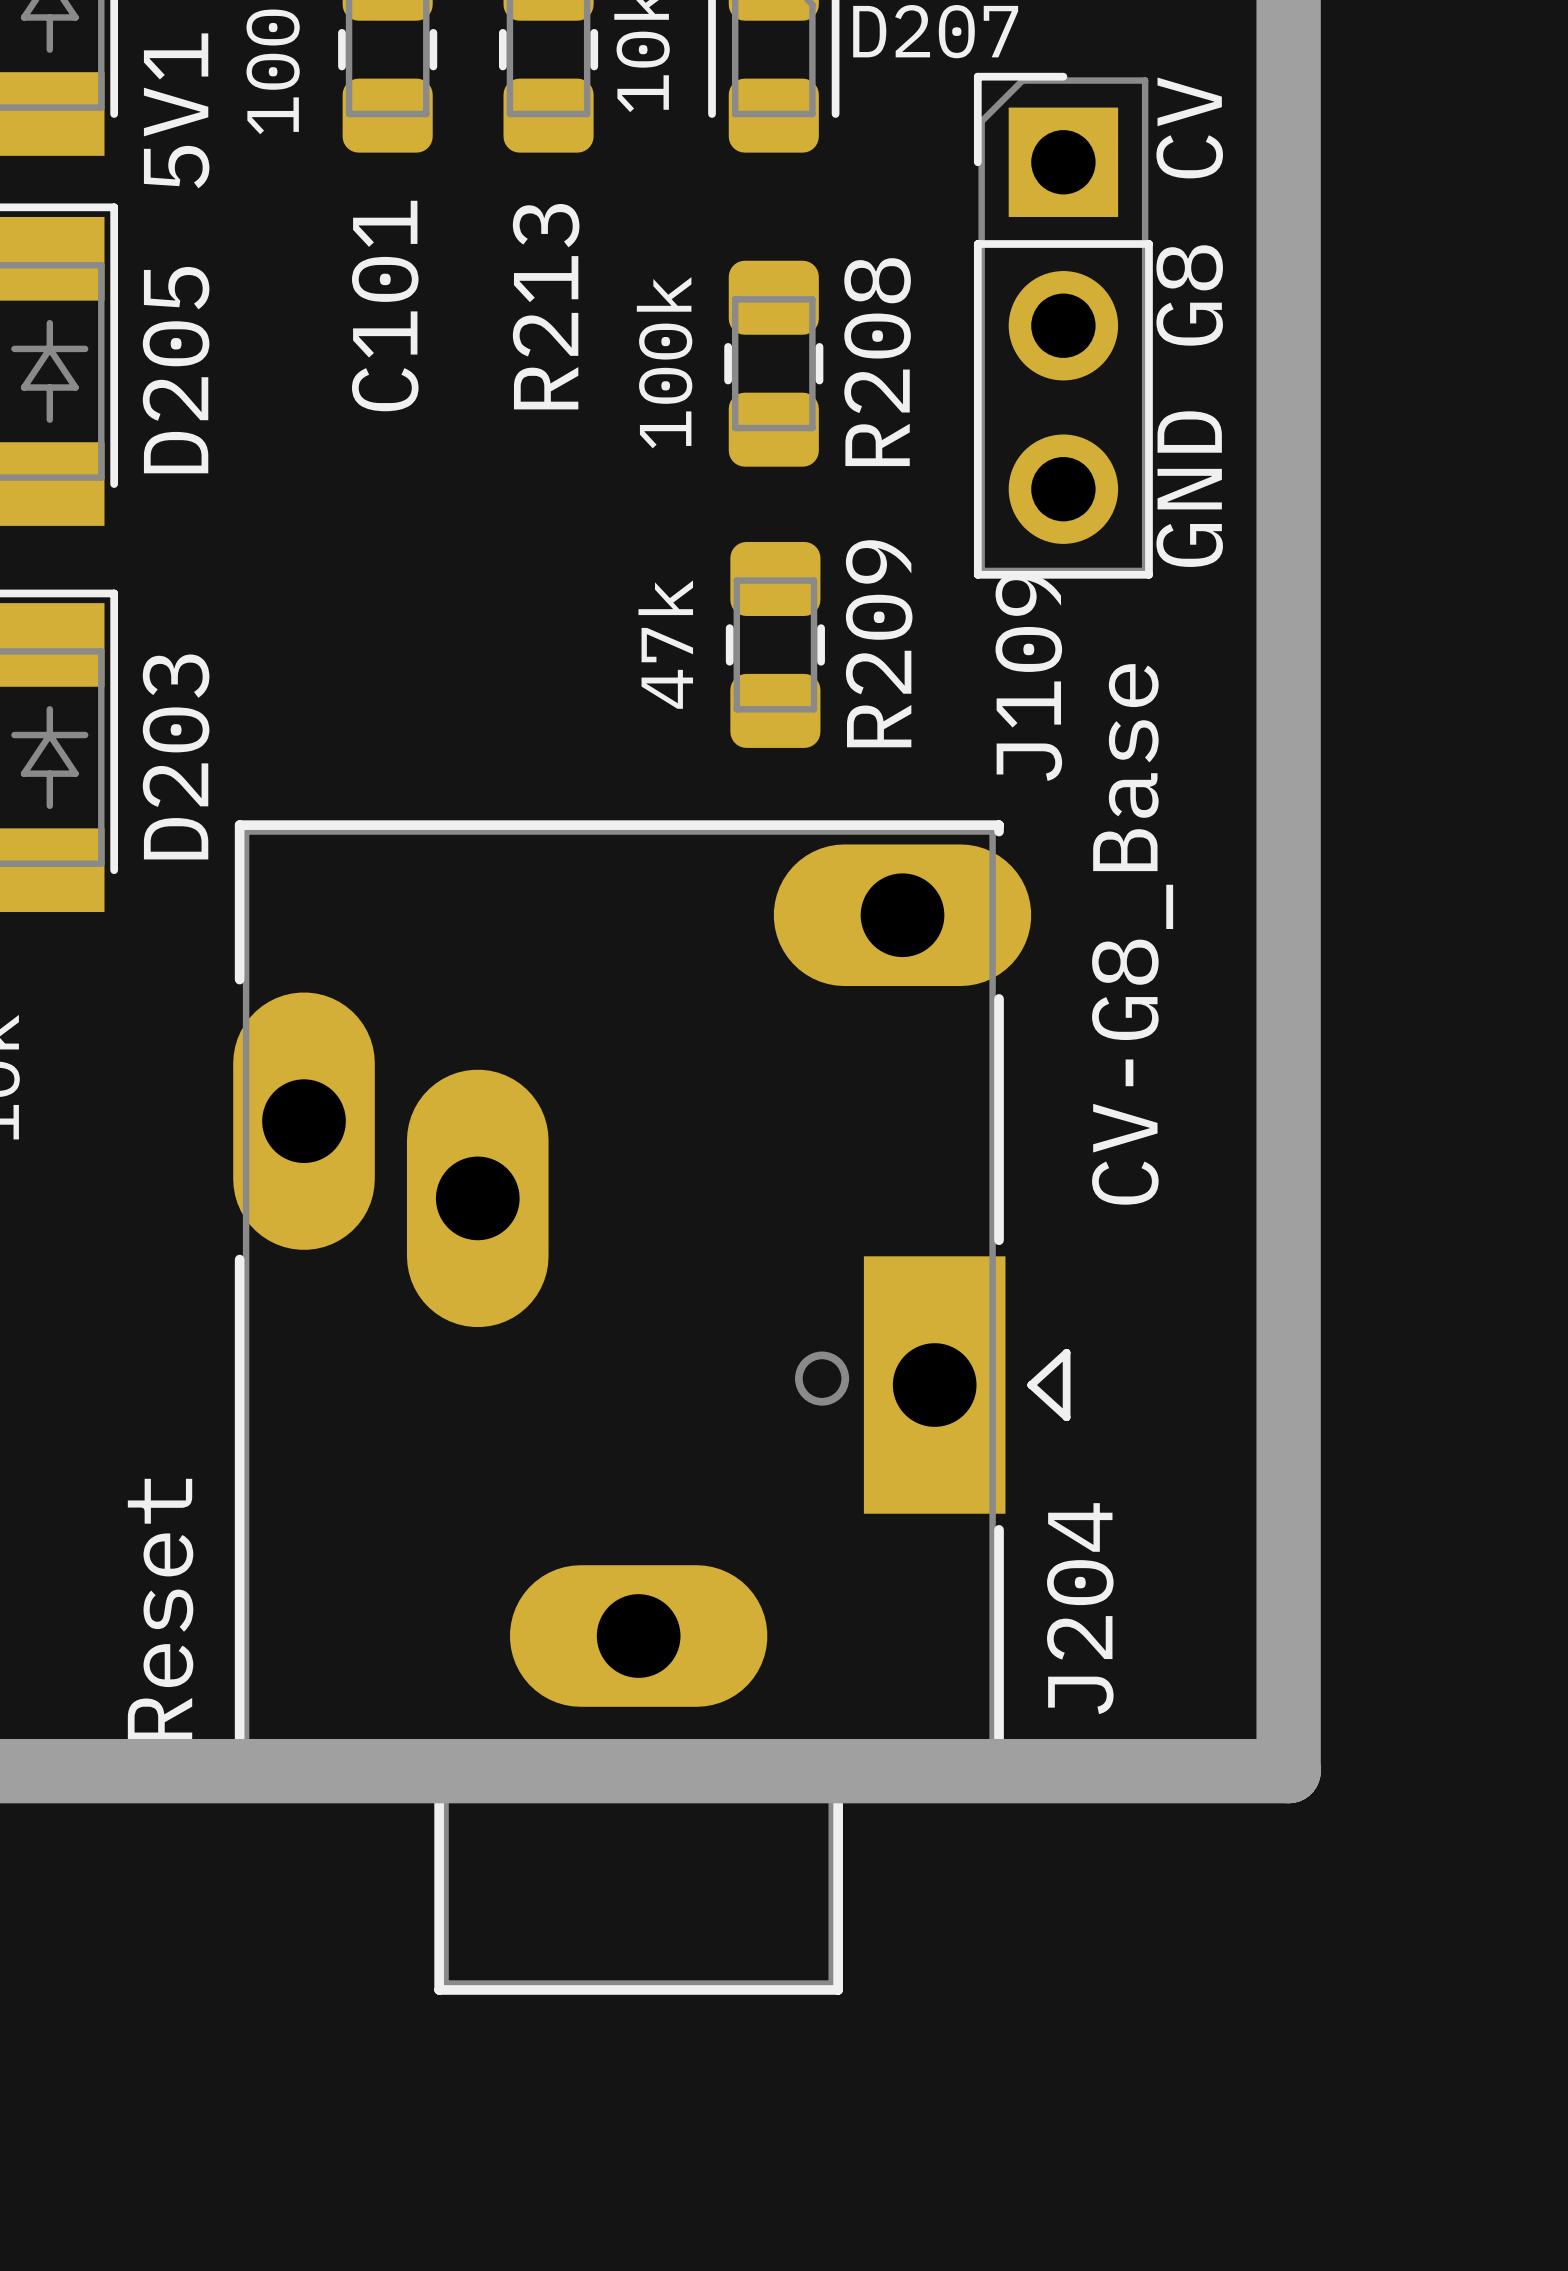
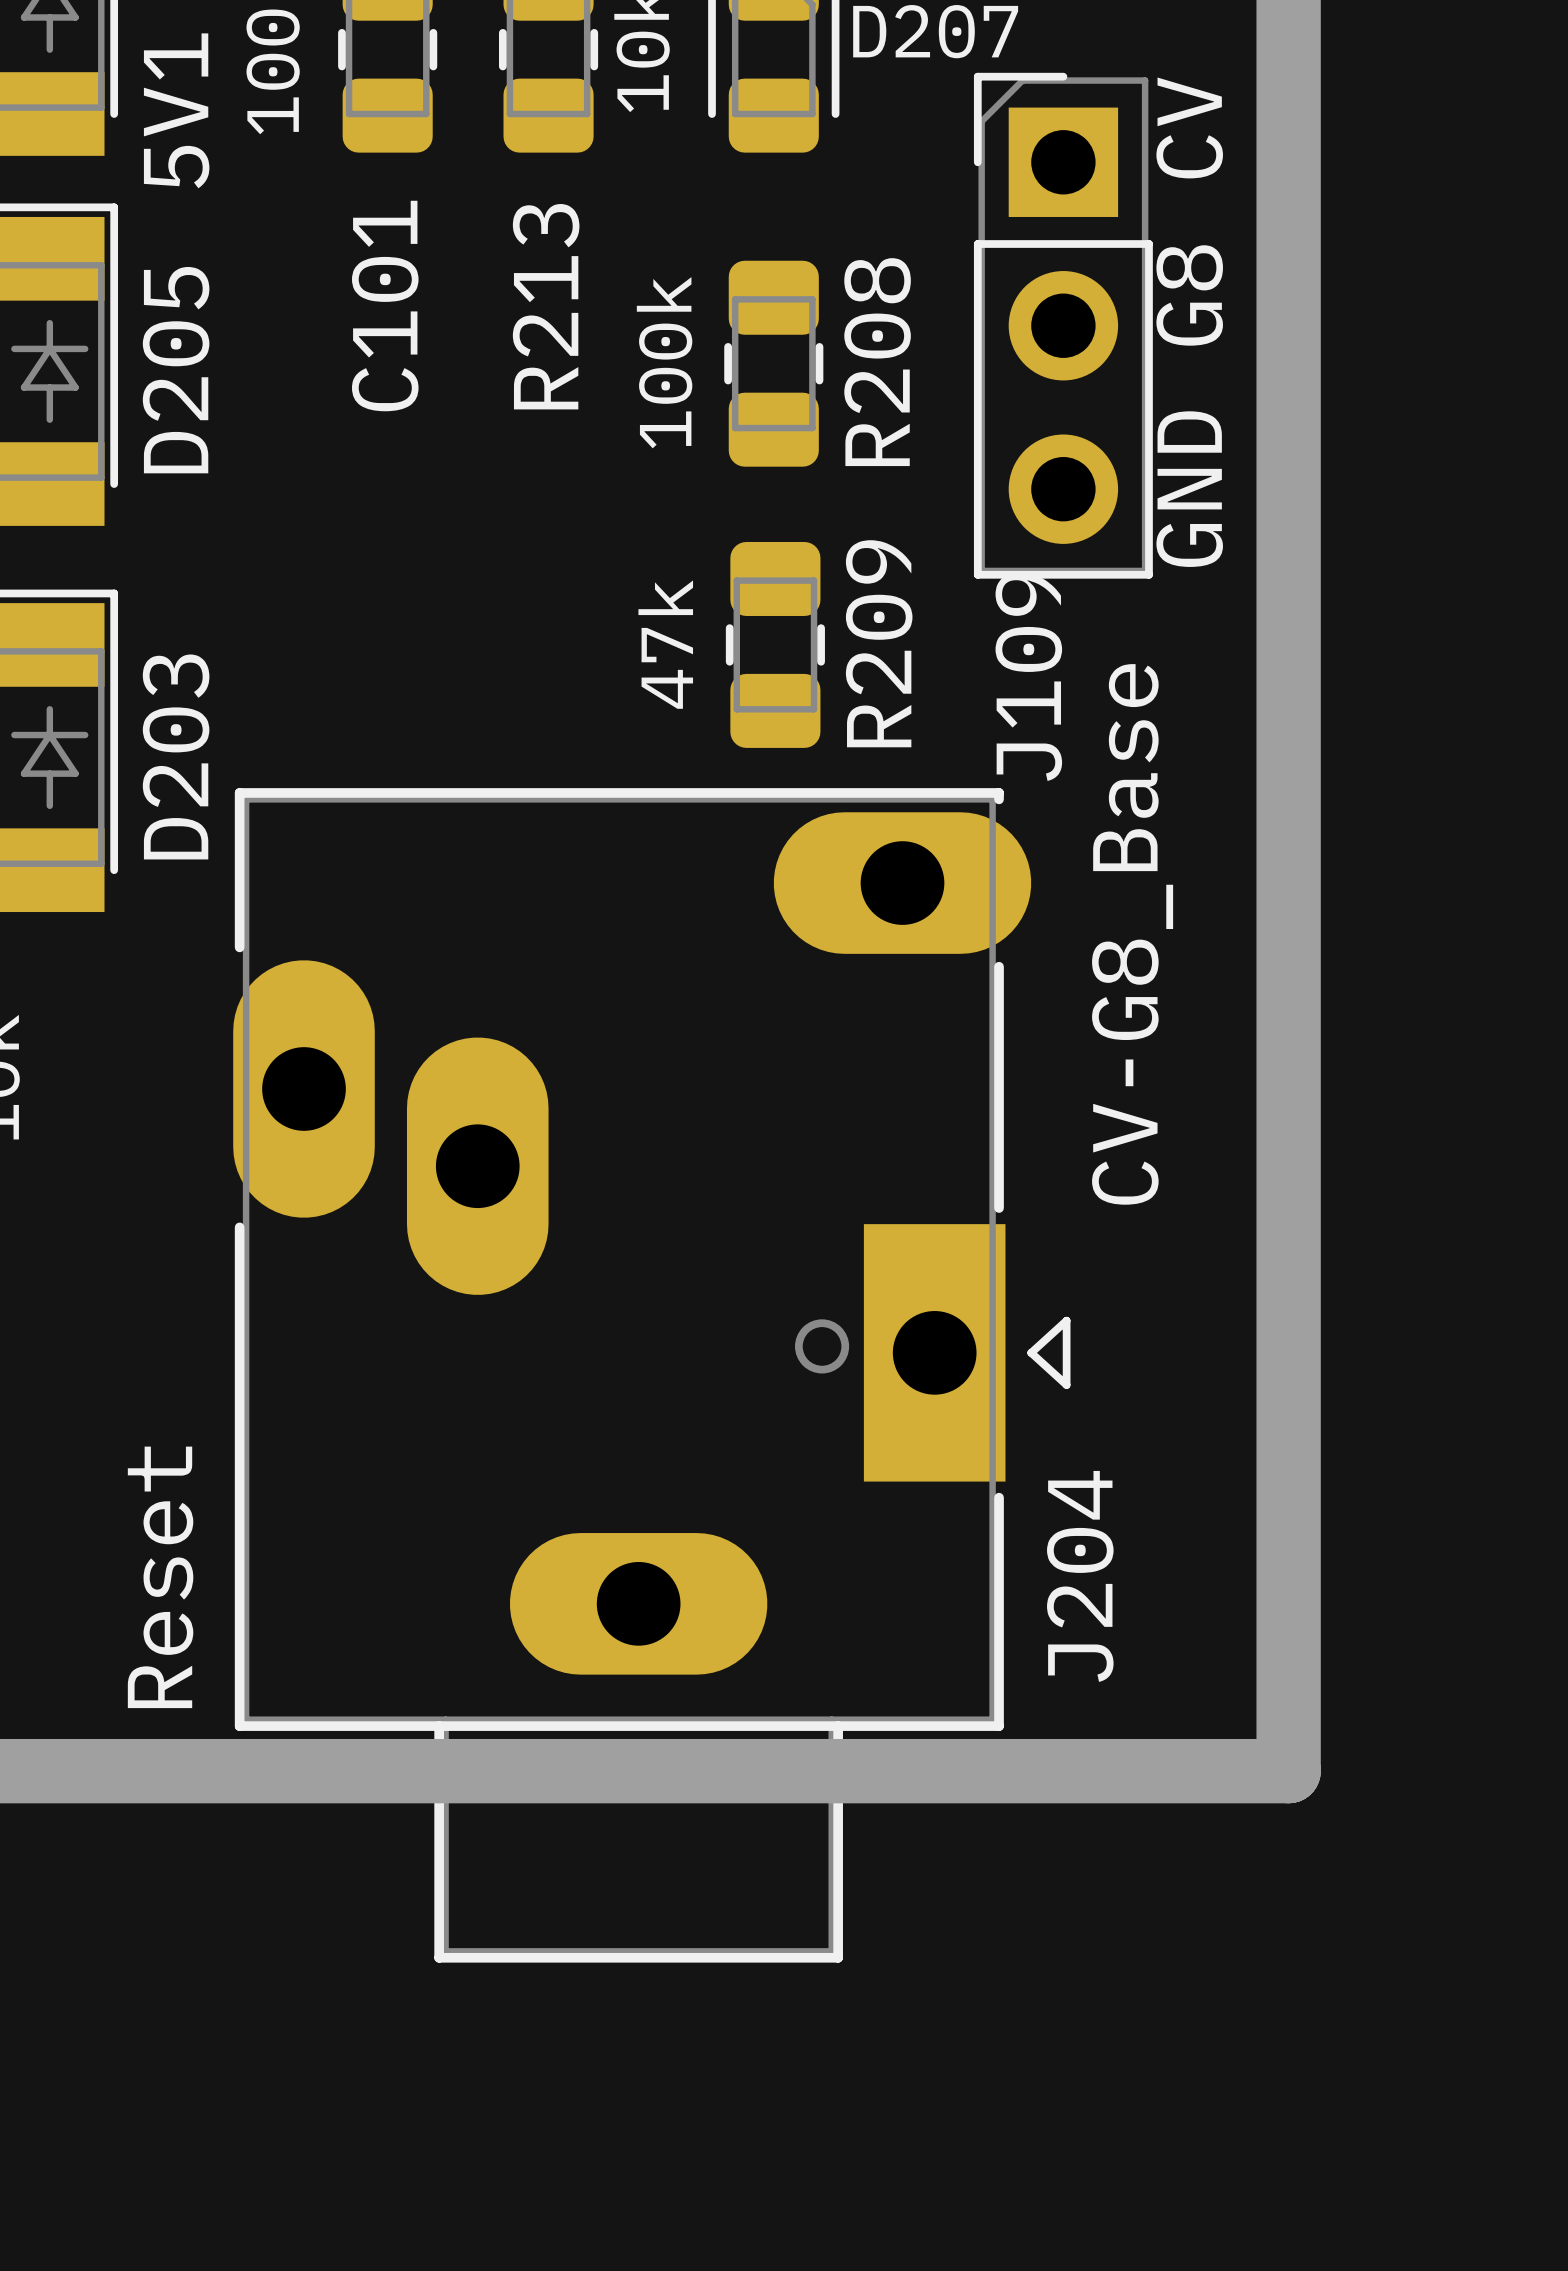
J204 position: (651, 1407) -> (651, 1375)

